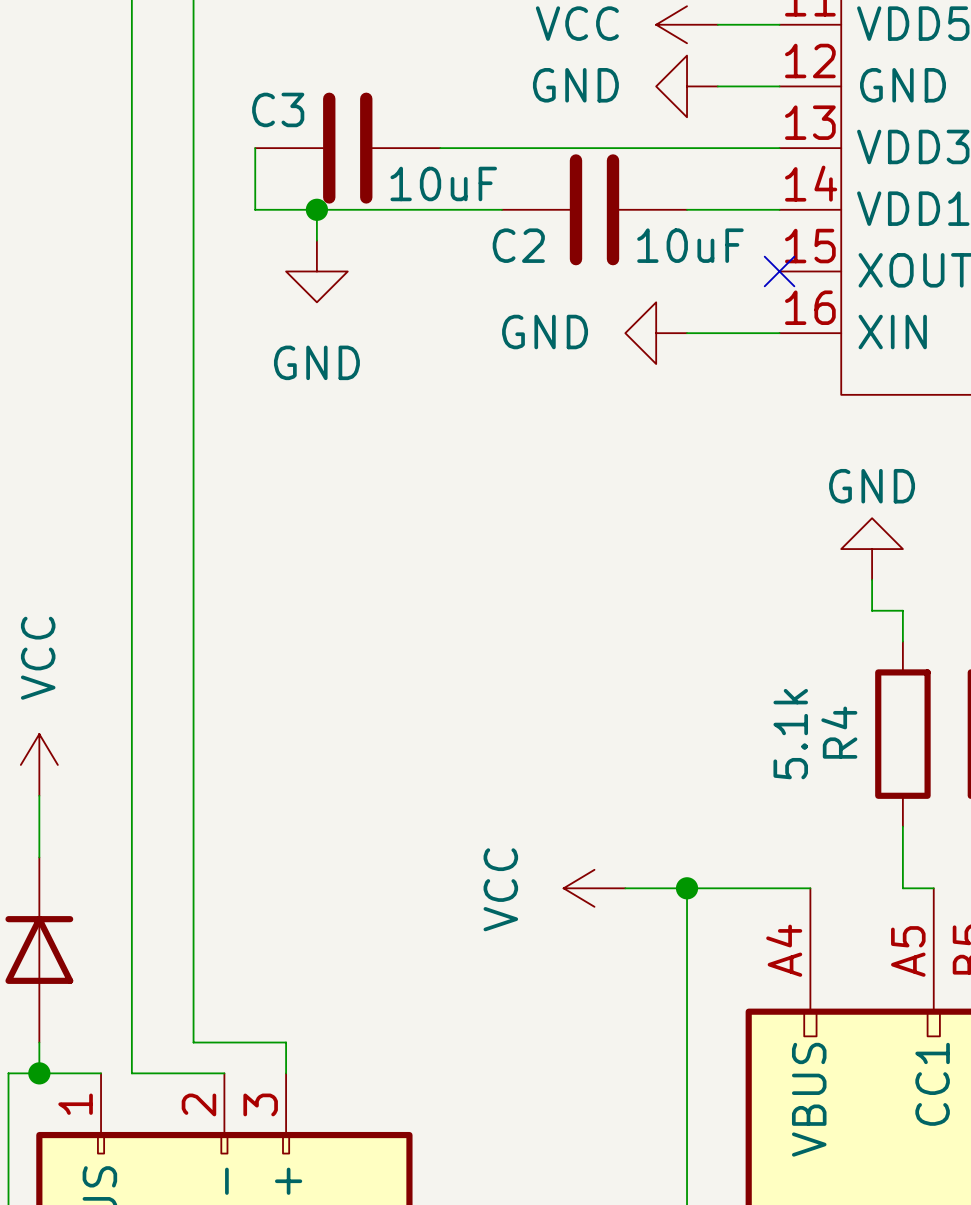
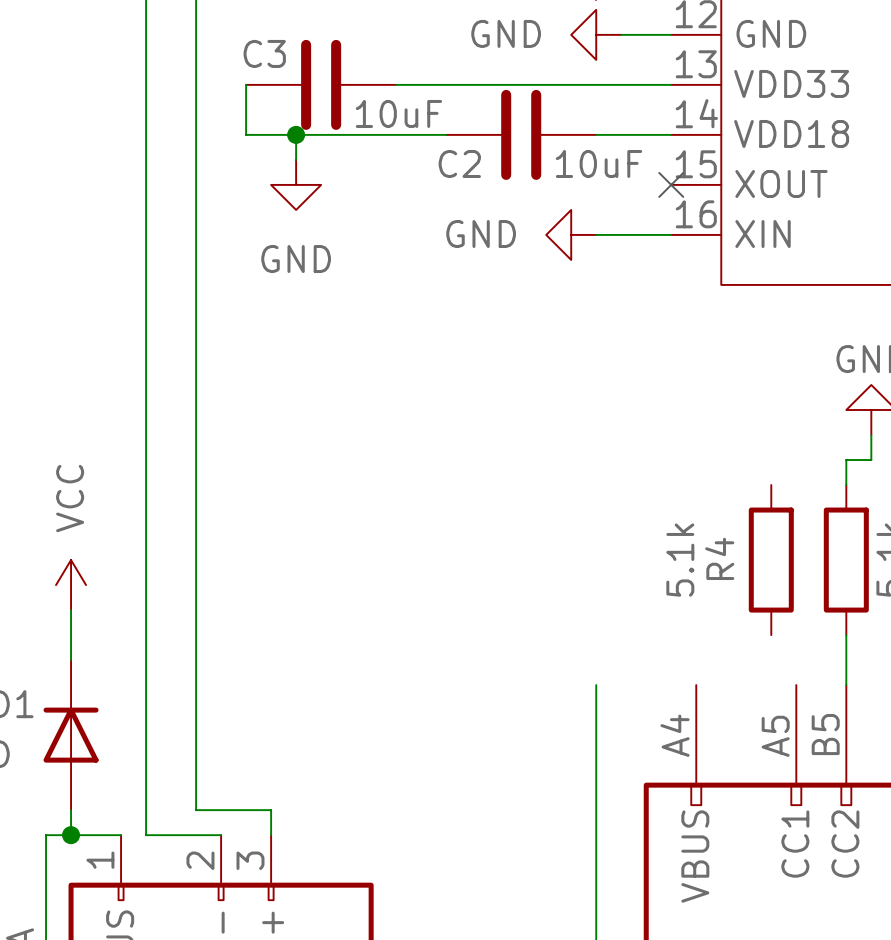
power symbol: GND (872, 549) -> none
wire: (872, 579) (872, 610) (902, 610) (902, 641) -> none
wire: (902, 826) (902, 888) (933, 888) -> none
power symbol: VCC (594, 888) -> none
wire: (625, 888) (810, 888) -> none
junction: (687, 888) -> none

